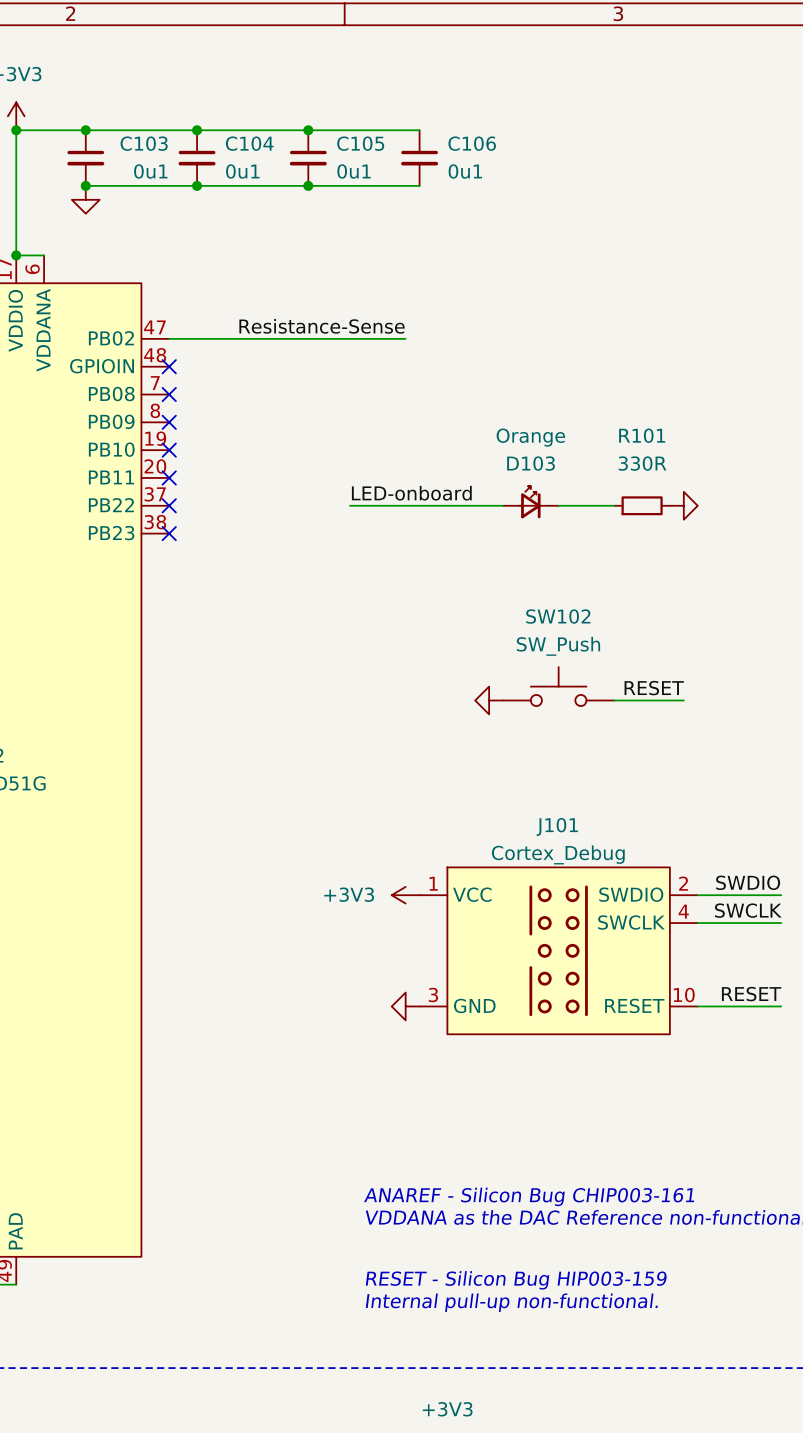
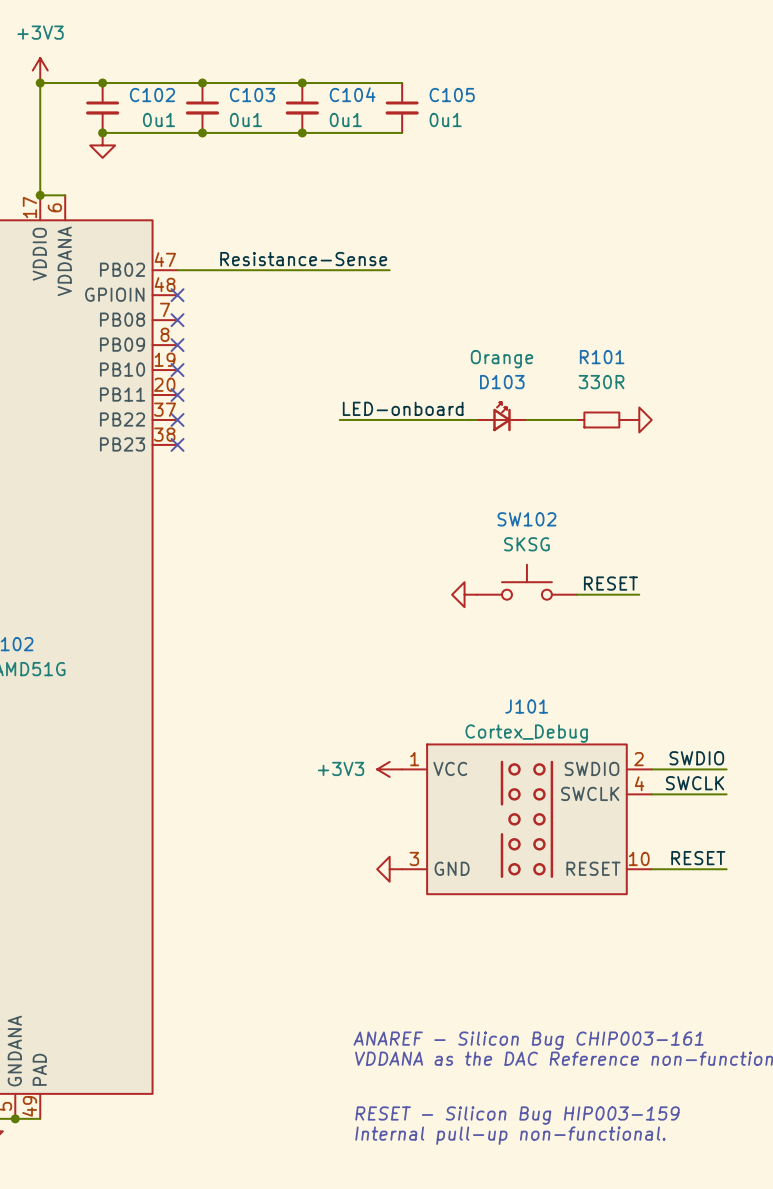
C103 name: C103 (144, 143) -> C102 (152, 95)
C104 name: C104 (249, 143) -> C103 (252, 95)
C105 name: C105 (360, 143) -> C104 (352, 94)
C106 name: C106 (472, 143) -> C105 (452, 95)
SW102 value: SW_Push (558, 646) -> SKSG (526, 544)

